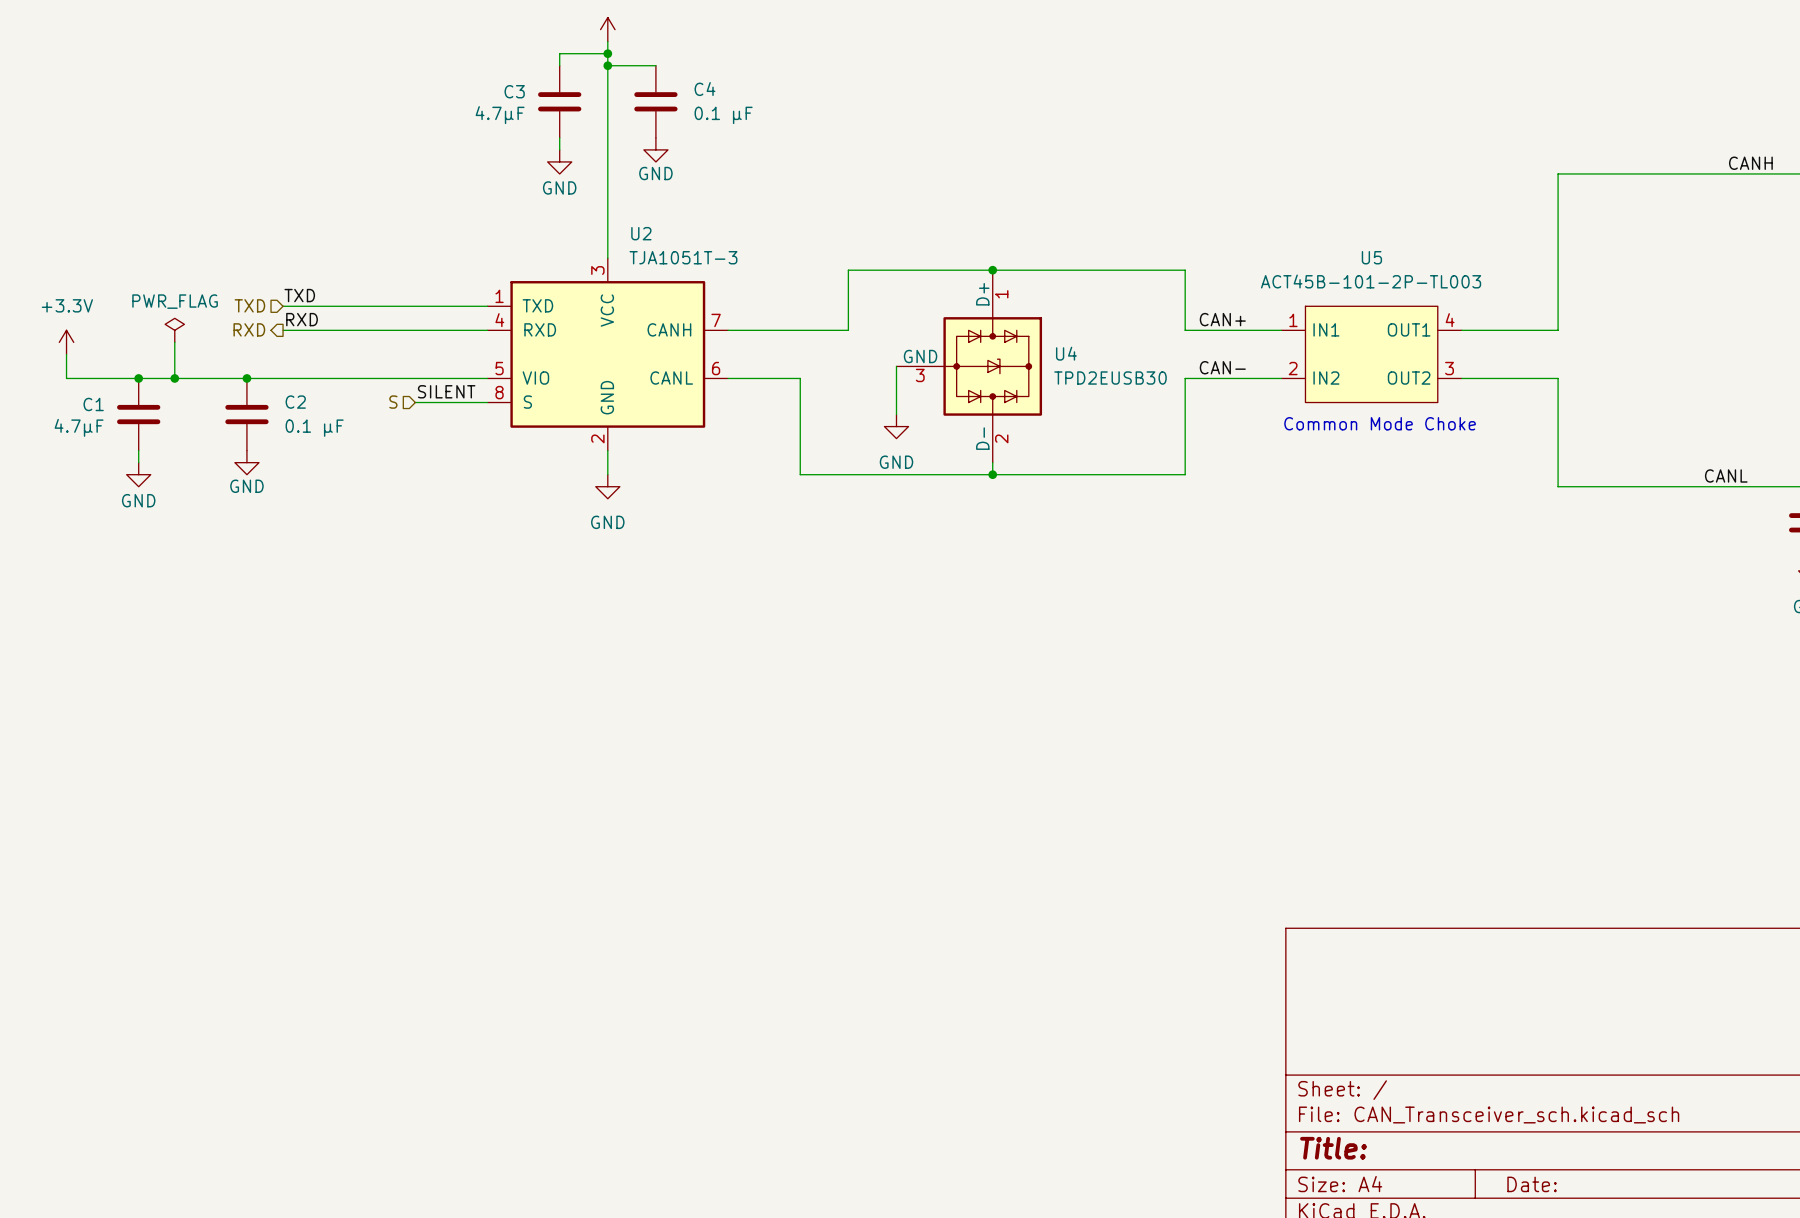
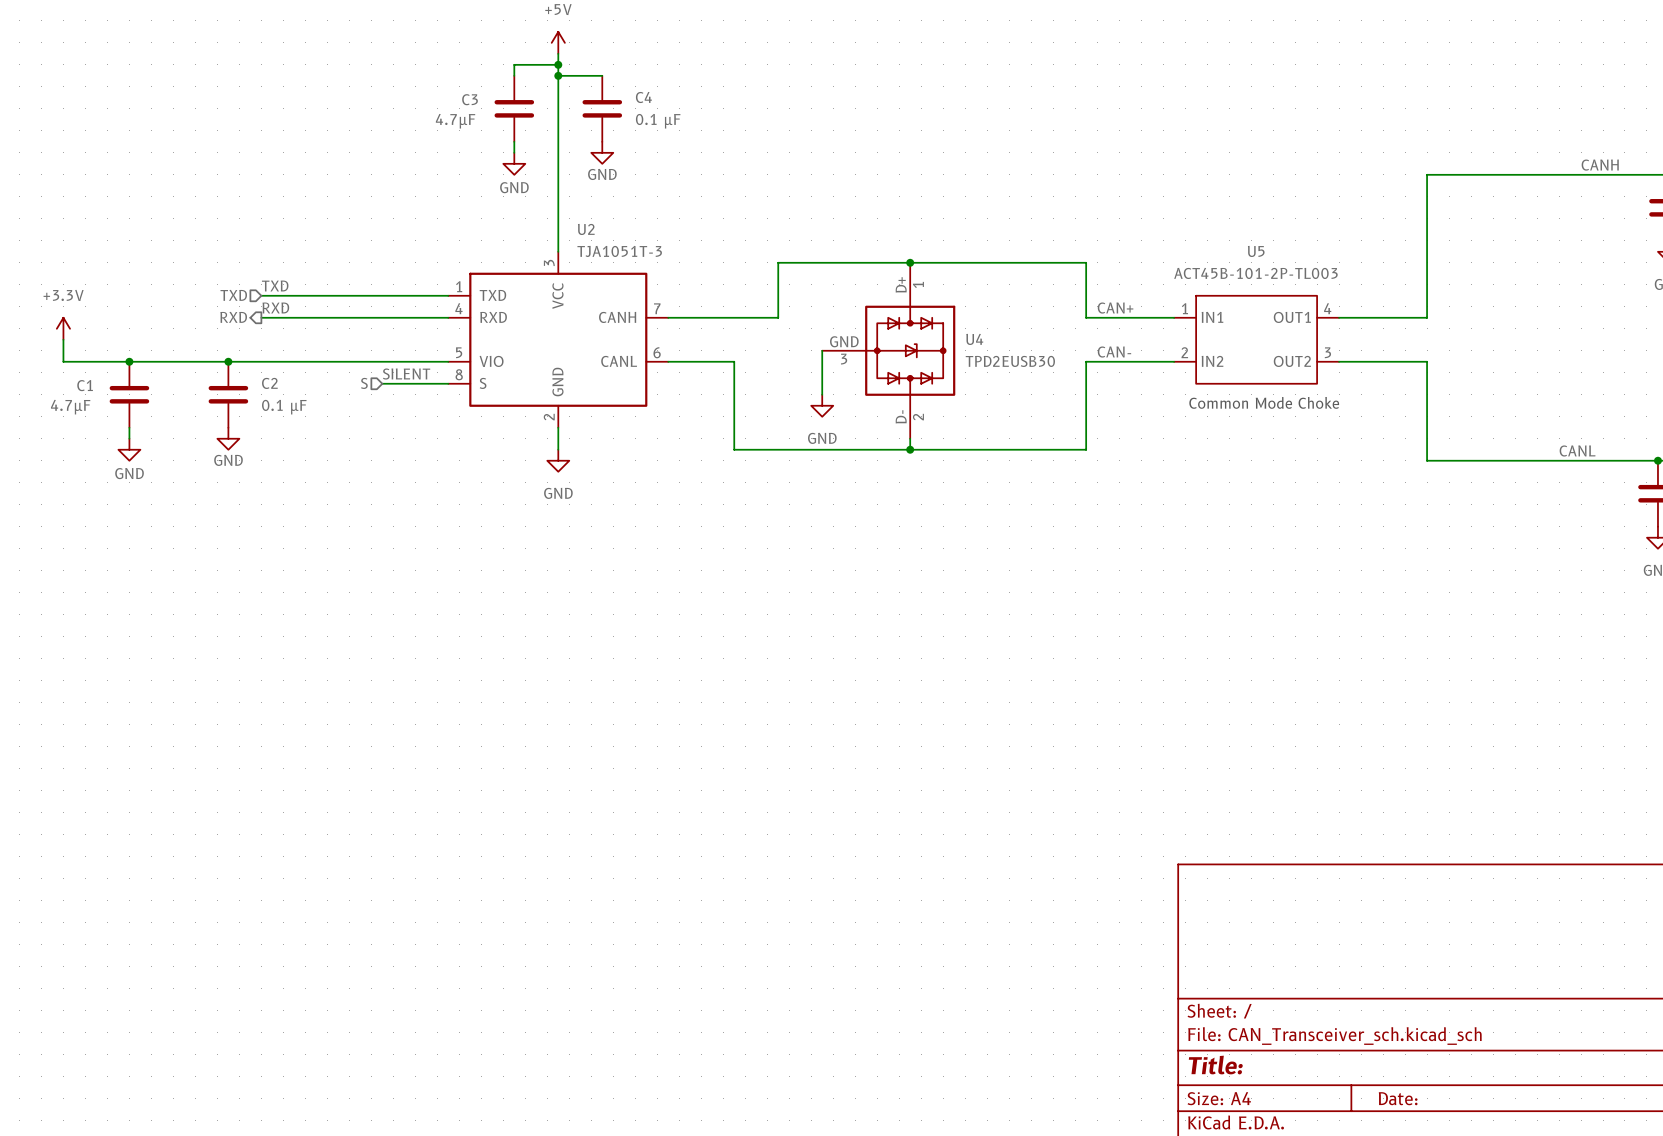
power symbol: PWR_FLAG (174, 330) -> none
wire: (174, 342) (174, 378) -> none
junction: (174, 378) -> none

